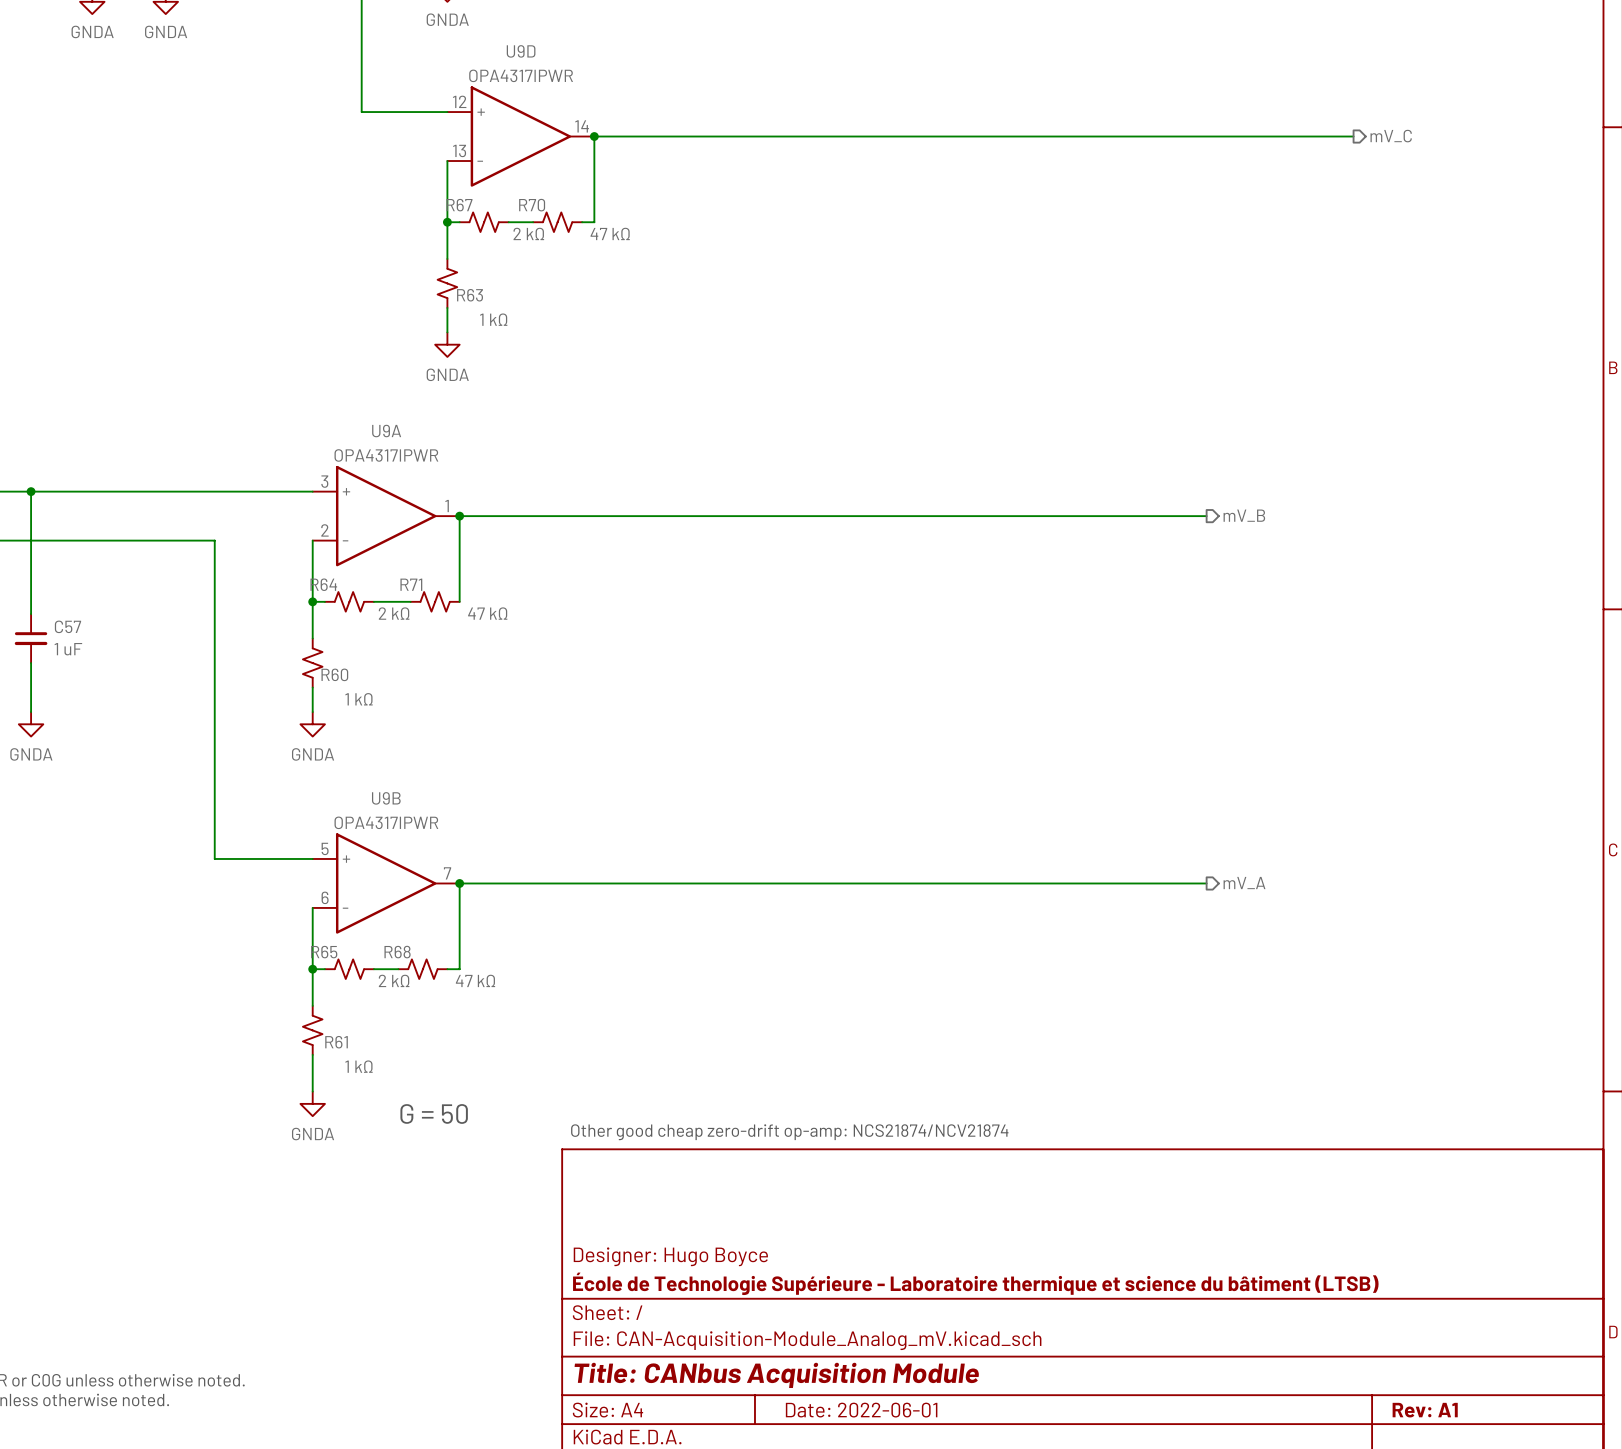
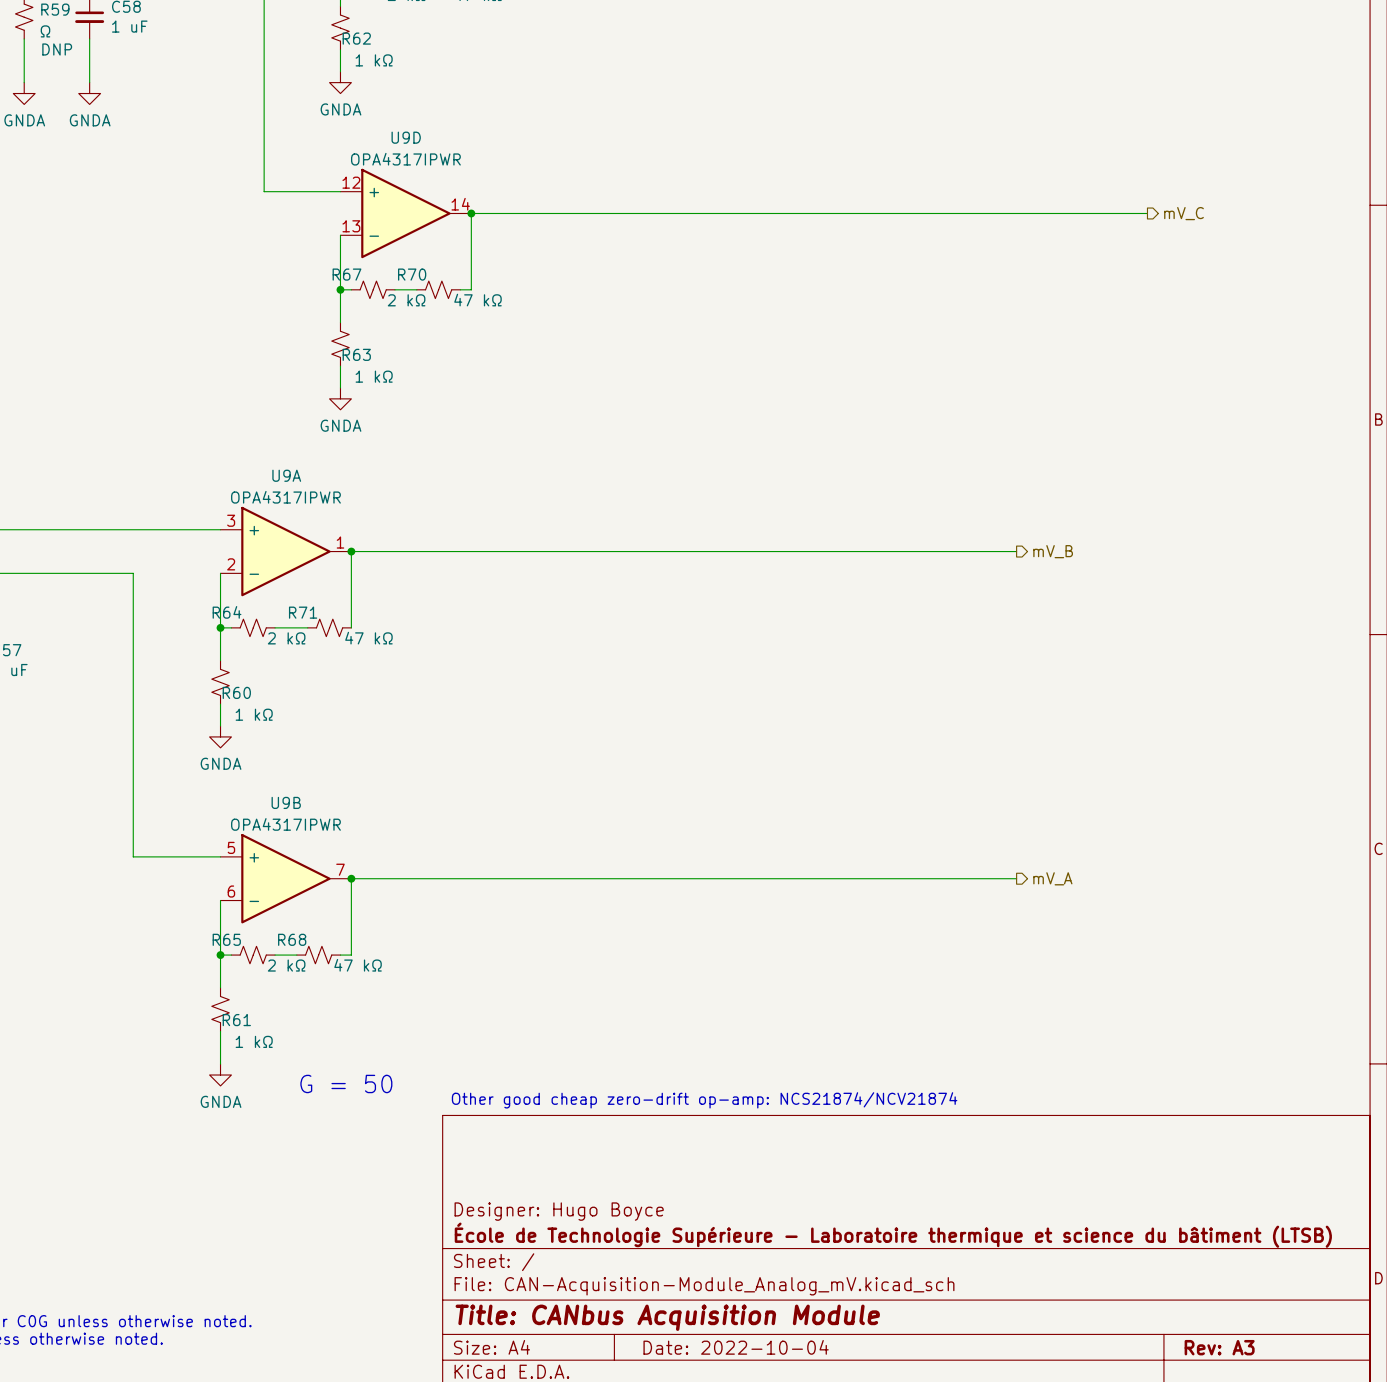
title block: Date: 2022-06-01 (861, 1410) -> Date: 2022-10-04 (736, 1347)
title block: Rev: A1 (1425, 1410) -> Rev: A3 (1219, 1347)

